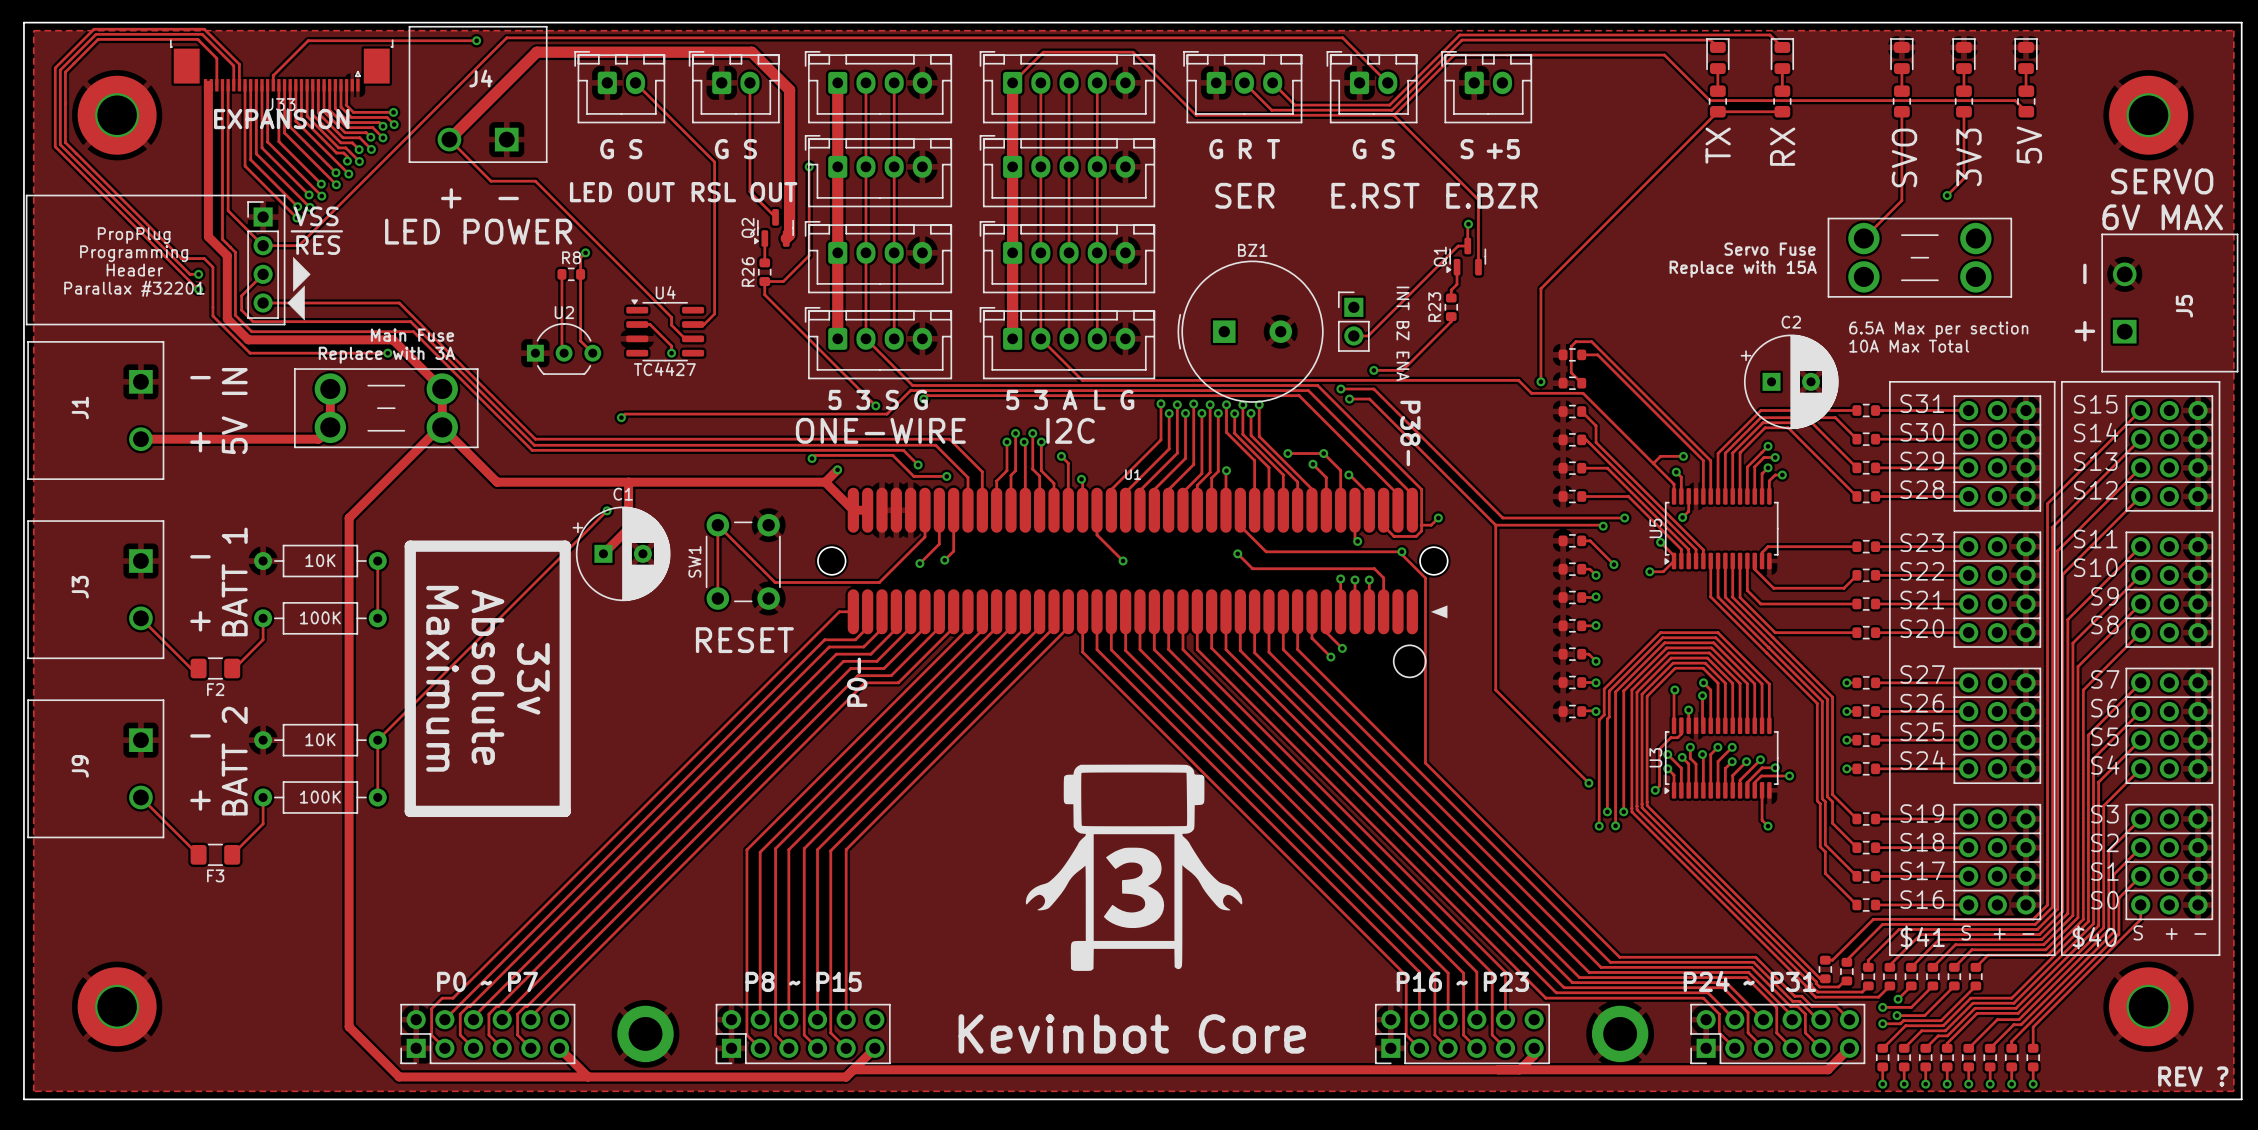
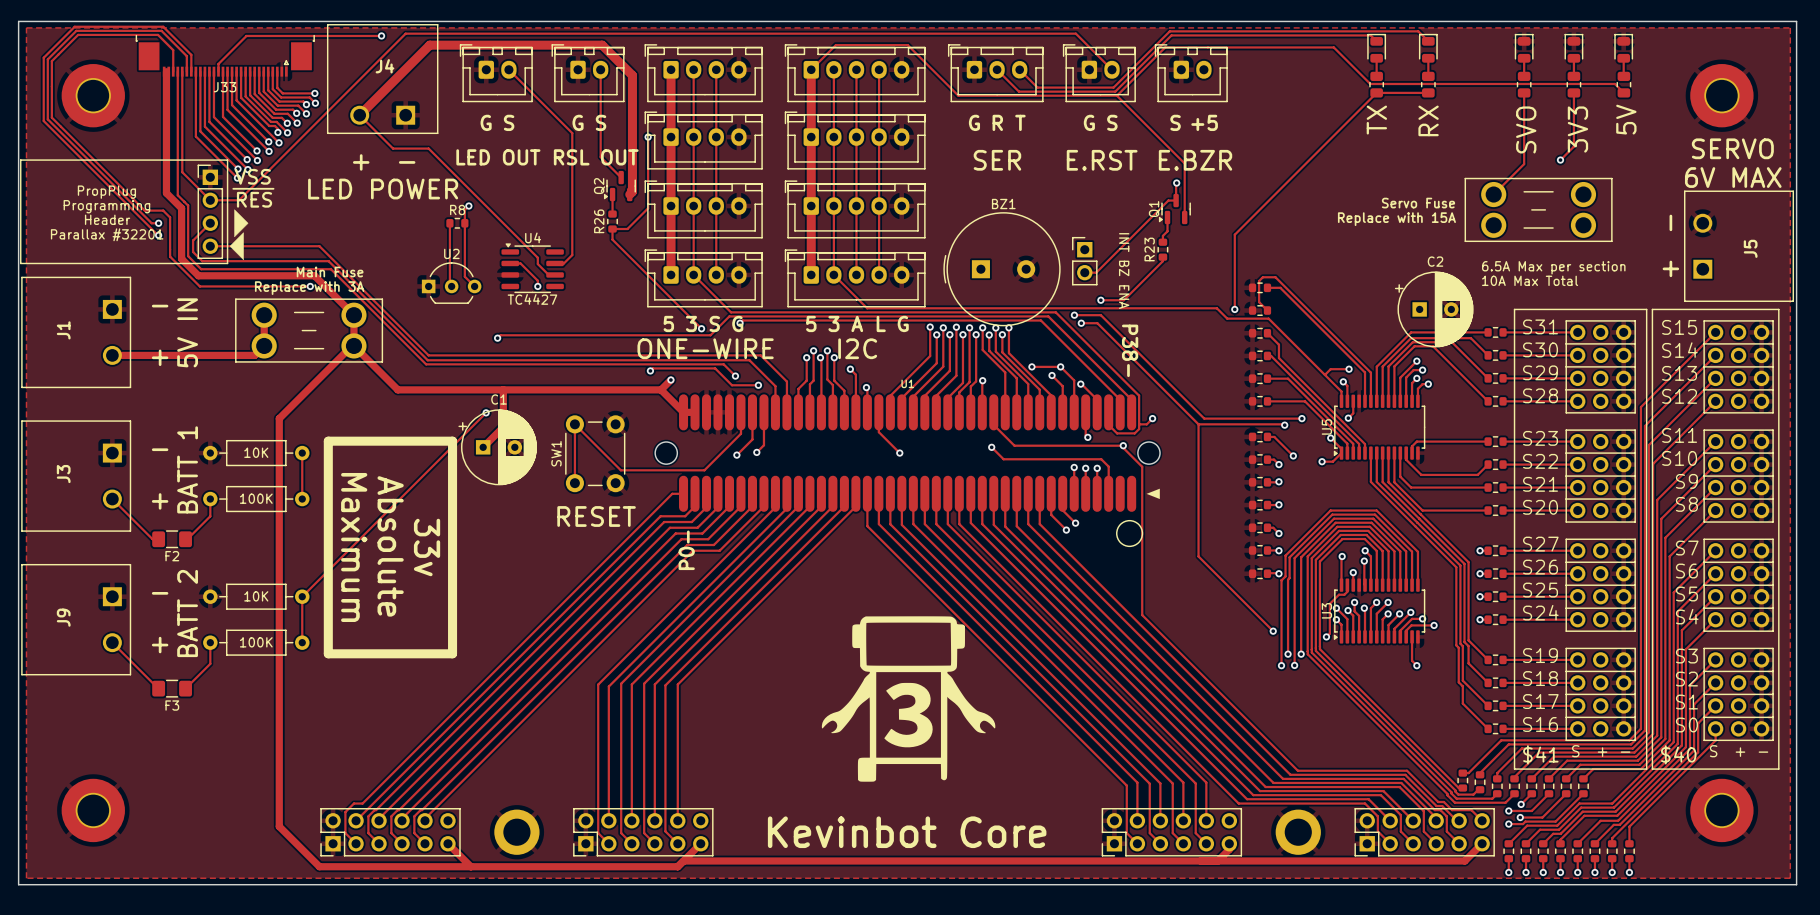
text: EXPANSION (281, 119) -> none
text: P0 ~ P7 (487, 981) -> none
text: P8 ~ P15 (803, 981) -> none
text: P16 ~ P23 (1462, 981) -> none
text: P24 ~ P31 (1749, 981) -> none
text: REV ? (2193, 1076) -> none

